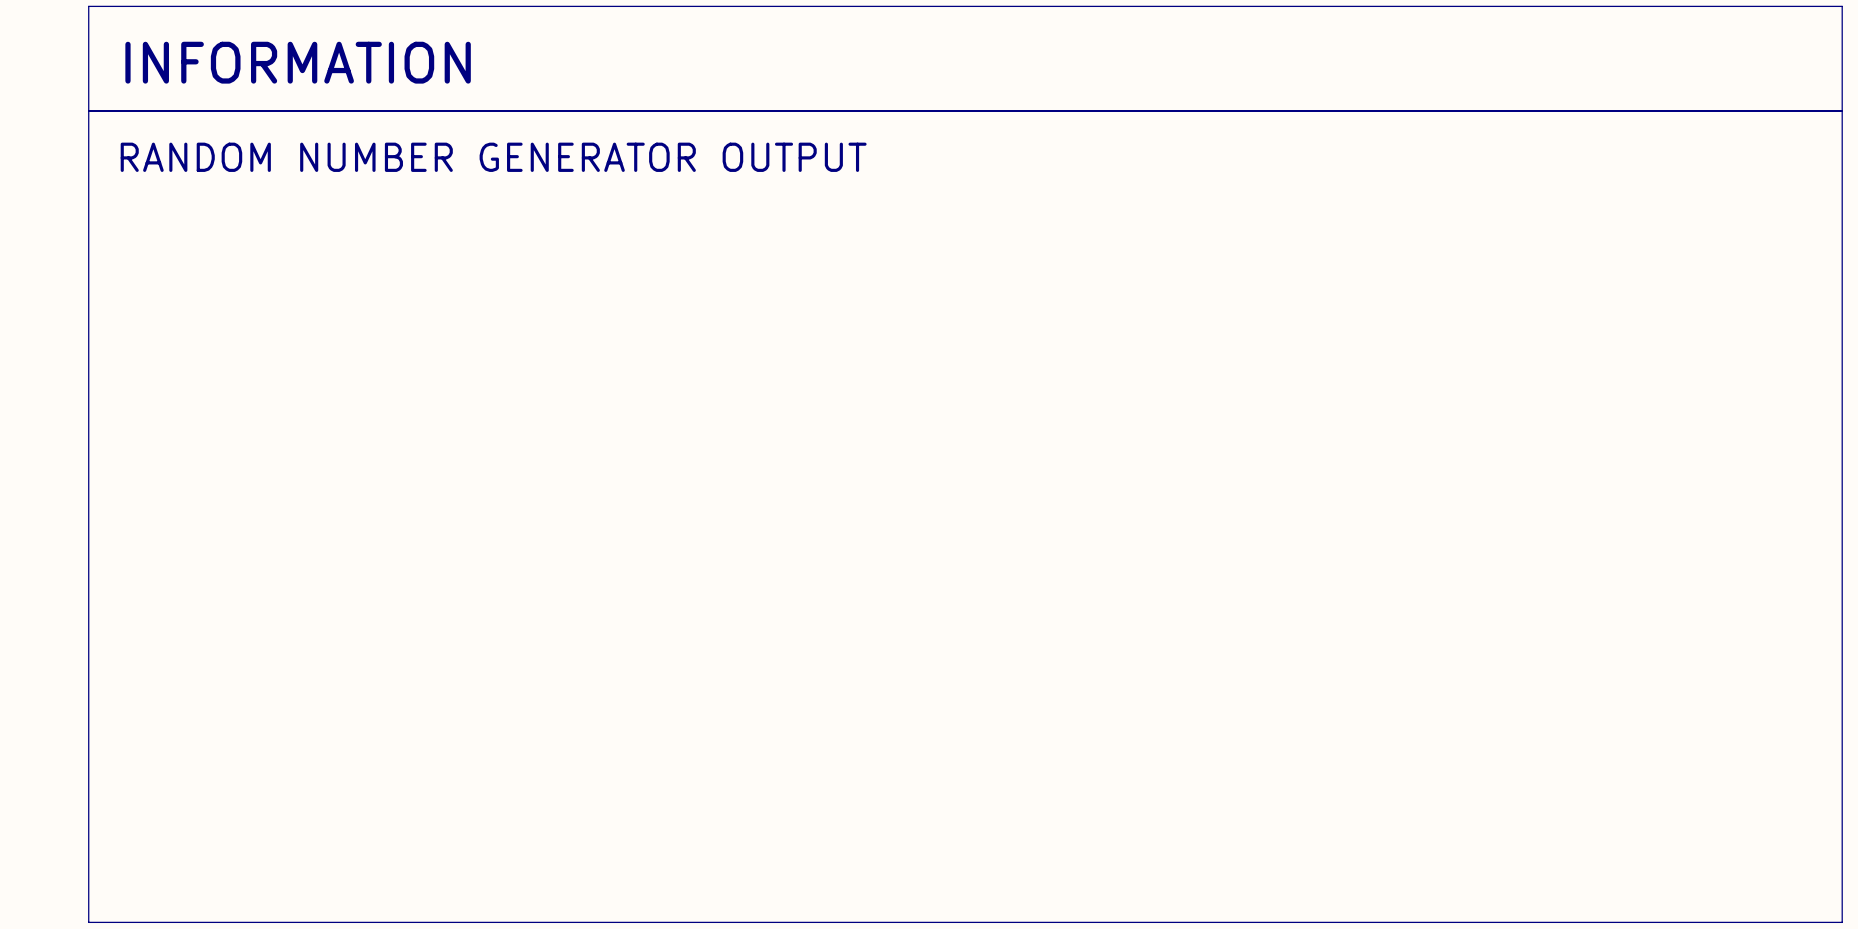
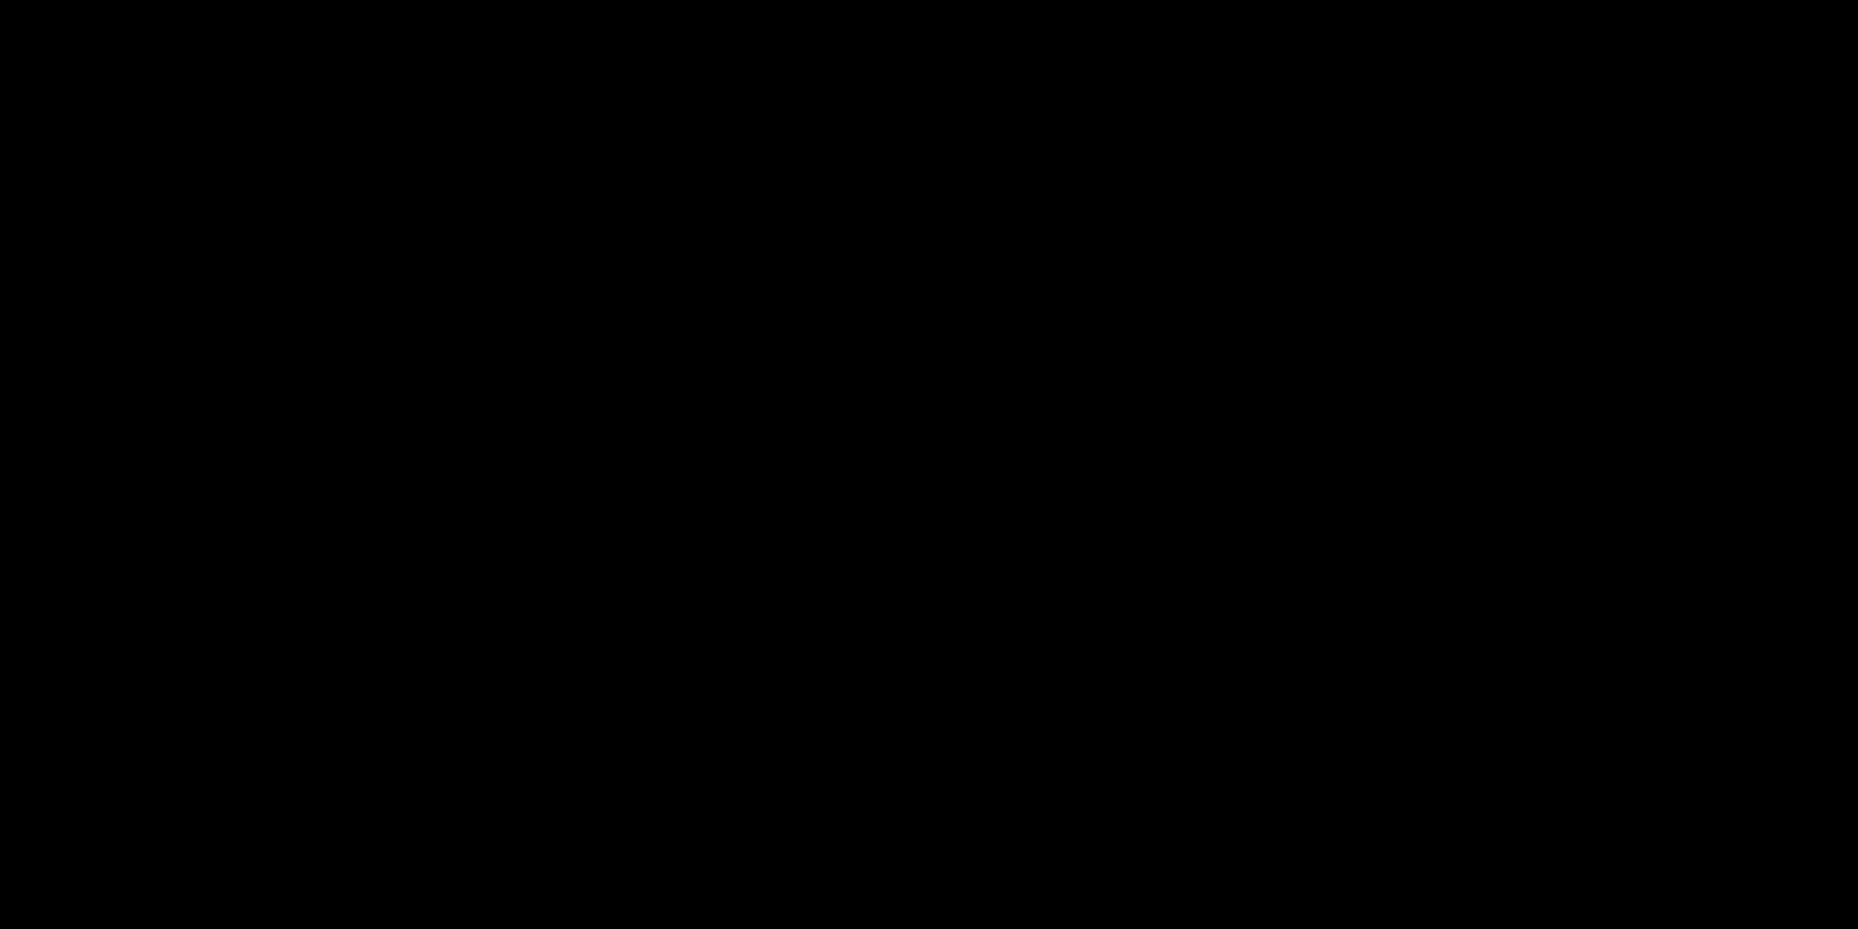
line: (88, 6) (88, 922) (1842, 922) (1842, 6) (88, 6) -> none
text: INFORMATION (298, 62) -> none
line: (88, 111) (1842, 111) -> none
text: RANDOM NUMBER GENERATOR OUTPUT (493, 157) -> none

